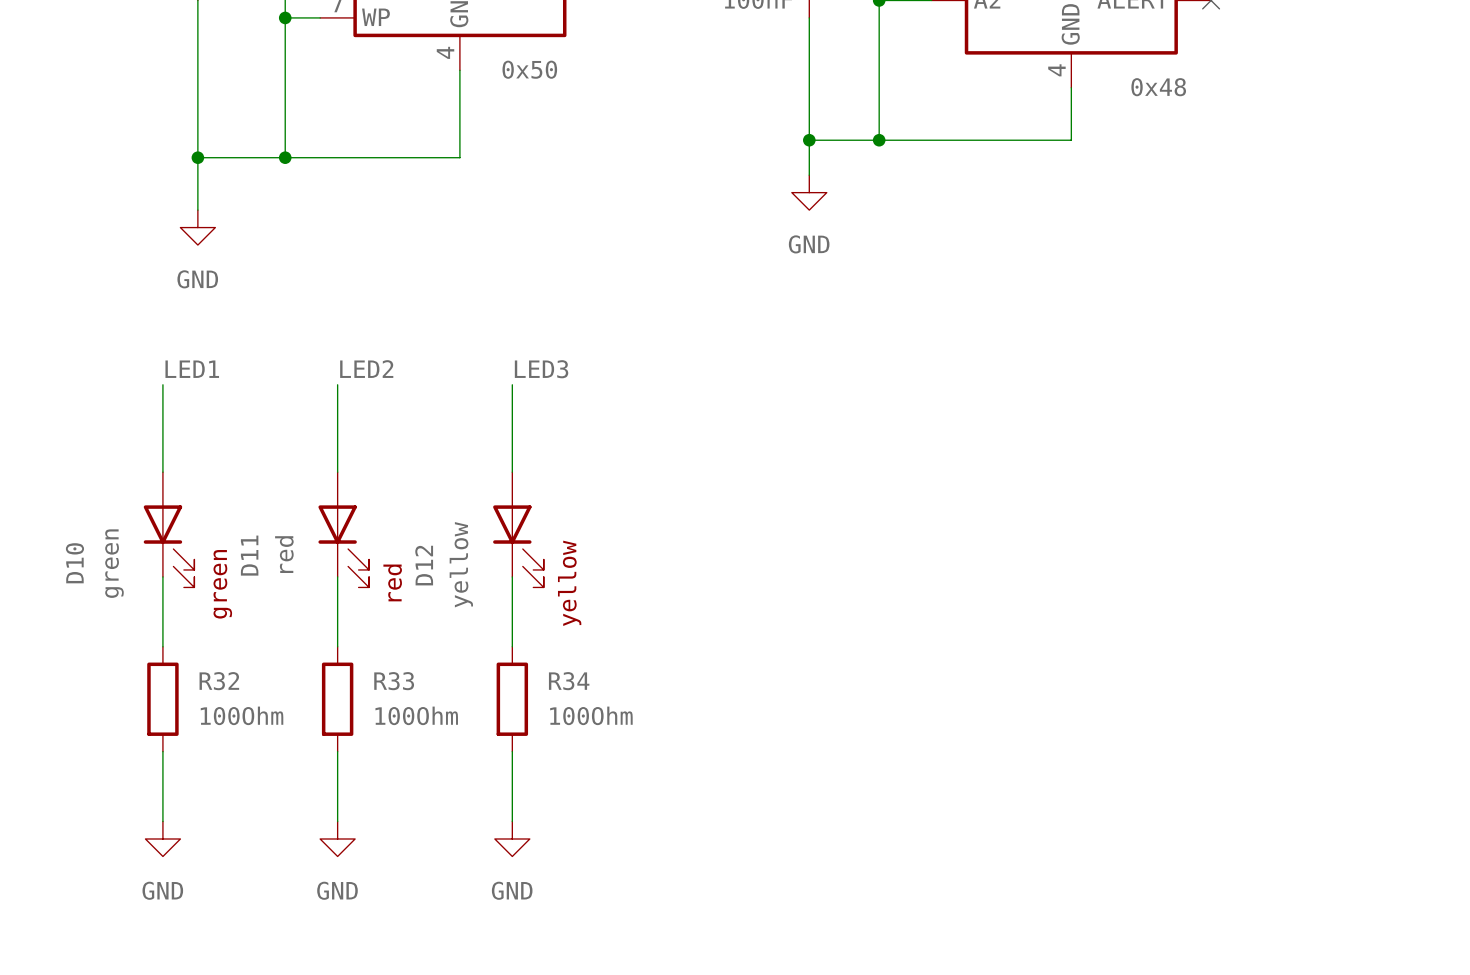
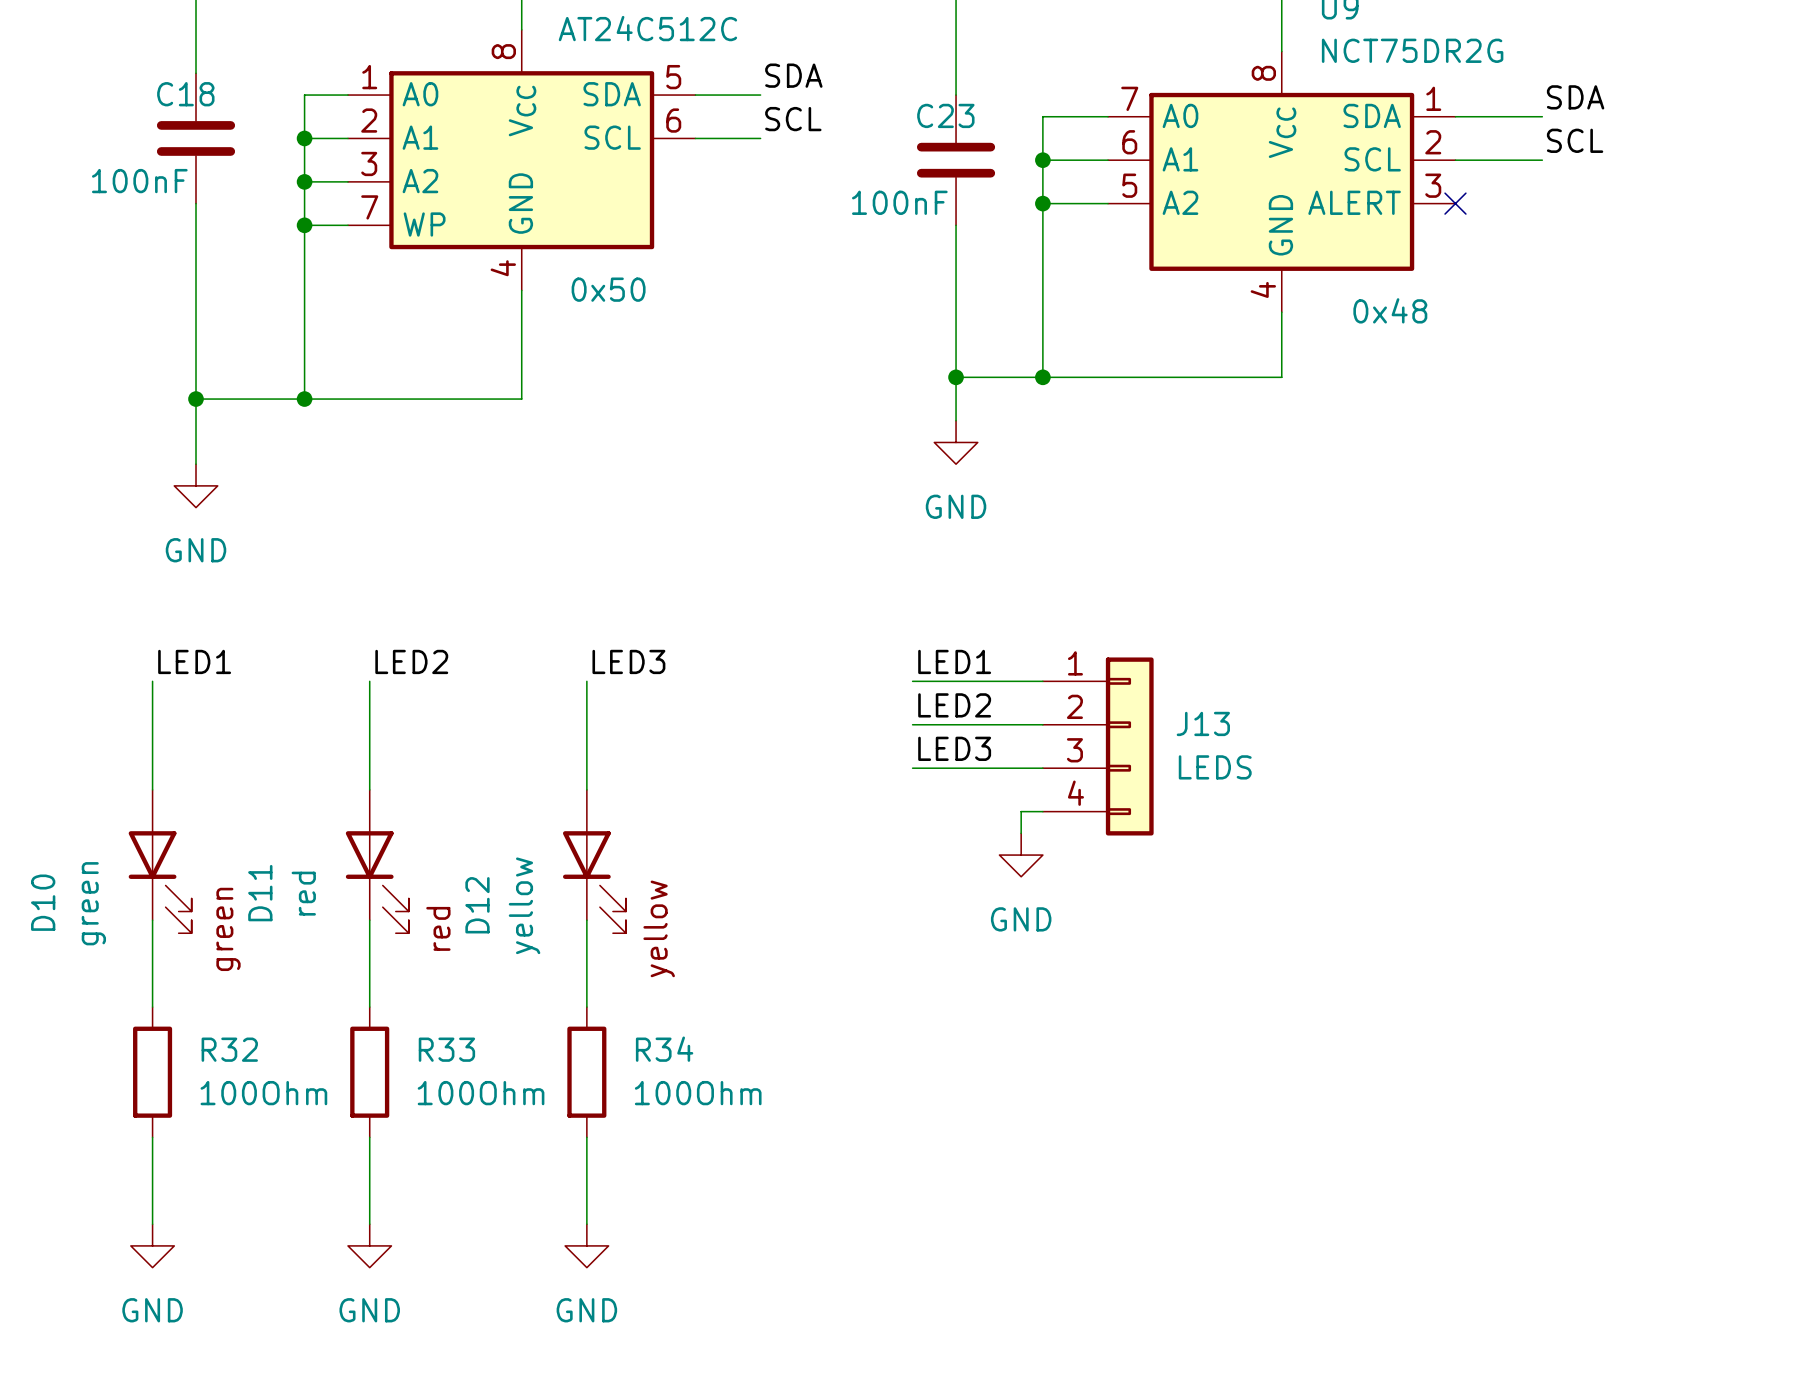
label: none -> LED1 (954, 661)
wire: none -> (912, 681) (1042, 681)
label: none -> LED2 (954, 705)
wire: none -> (912, 724) (1042, 724)
J13: none -> LEDS (1098, 746)
label: none -> LED3 (954, 748)
wire: none -> (912, 768) (1042, 768)
wire: none -> (1042, 811) (1021, 811) (1021, 833)
power symbol: none -> GND (1021, 855)

